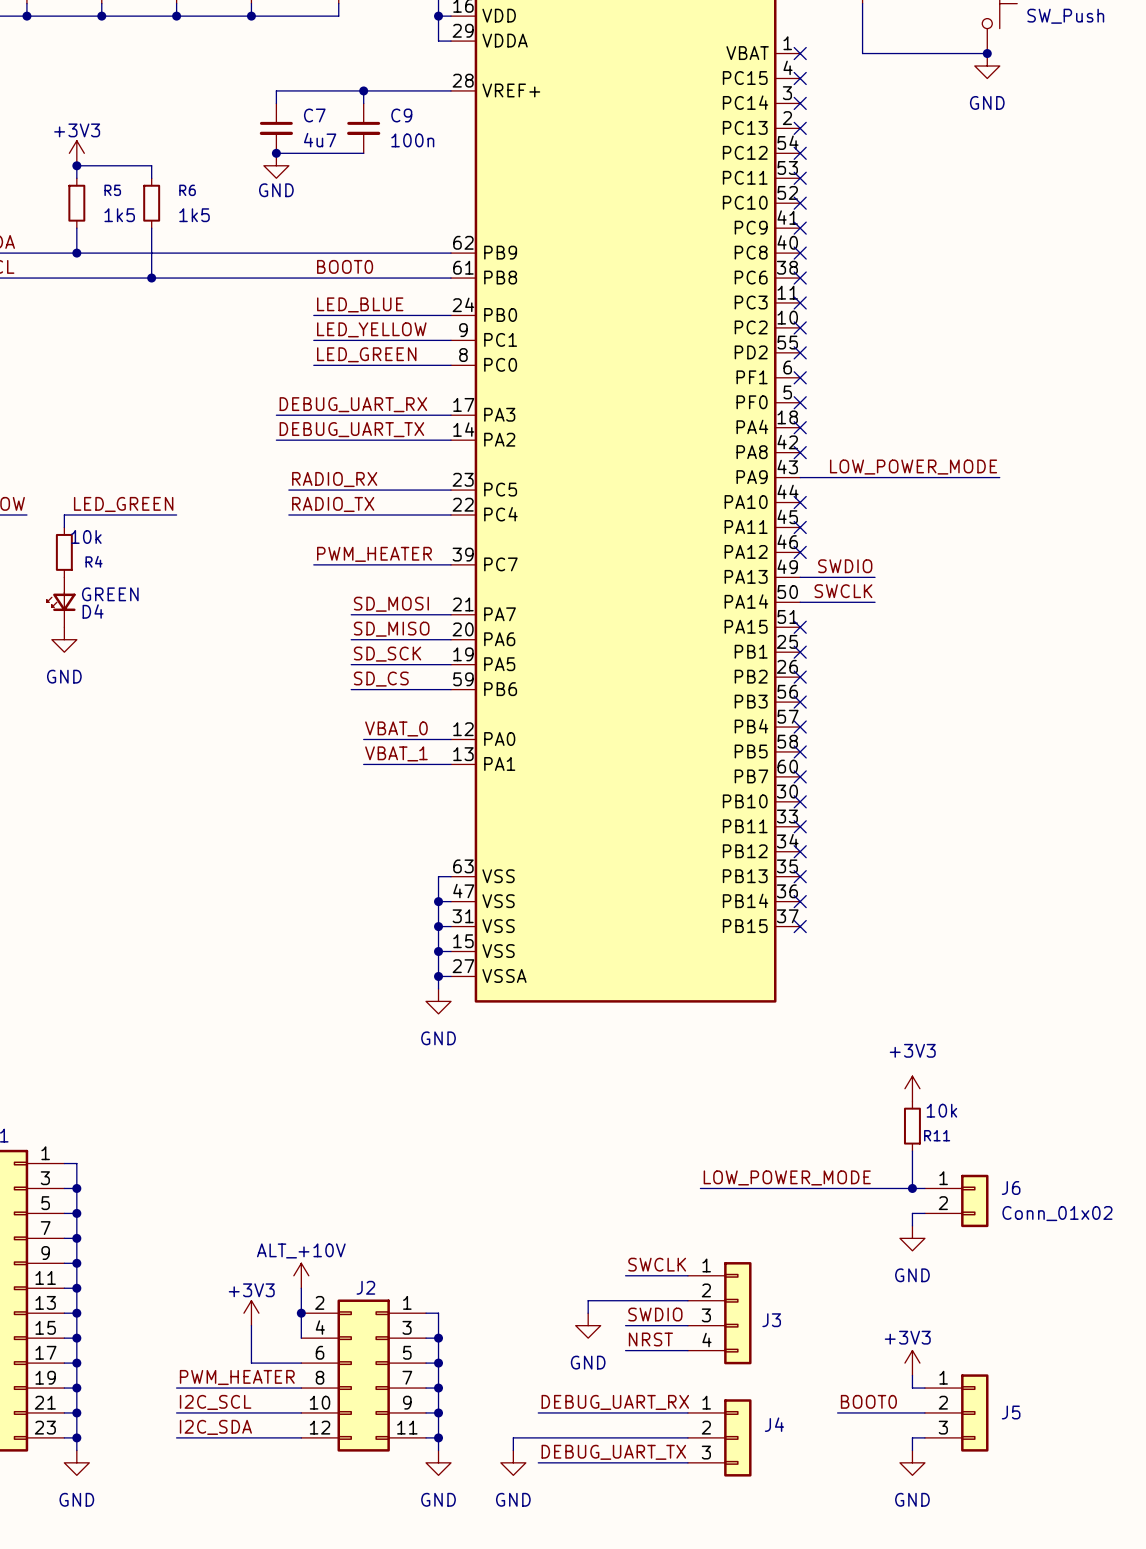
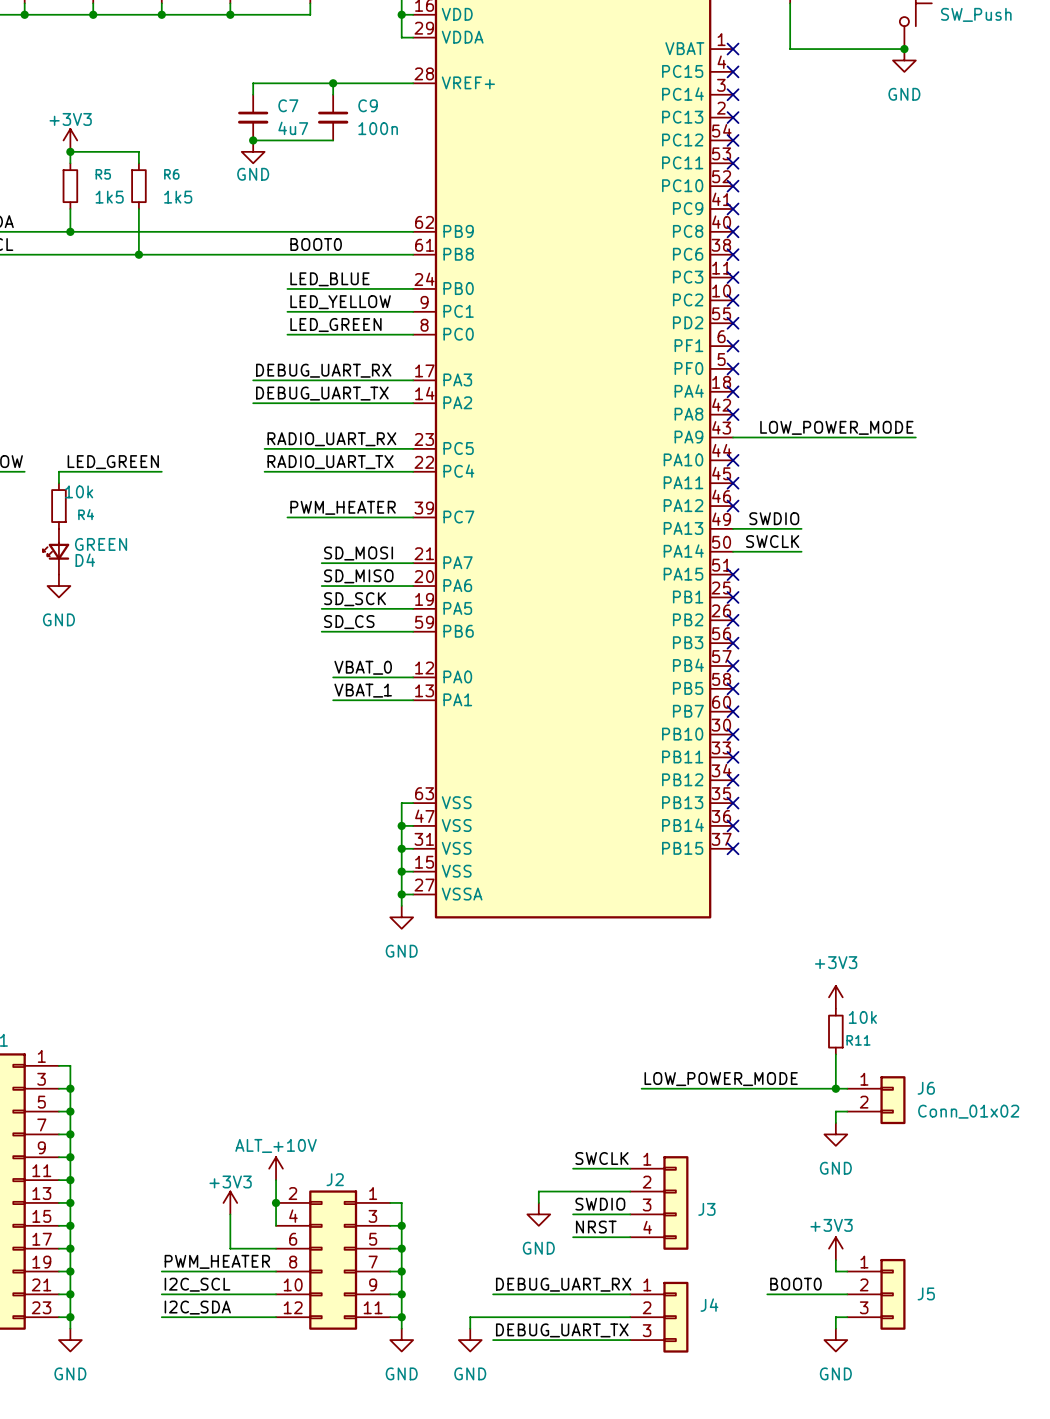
label: RADIO_RX (334, 479) -> RADIO_UART_RX (331, 439)
label: RADIO_TX (333, 504) -> RADIO_UART_TX (330, 462)

